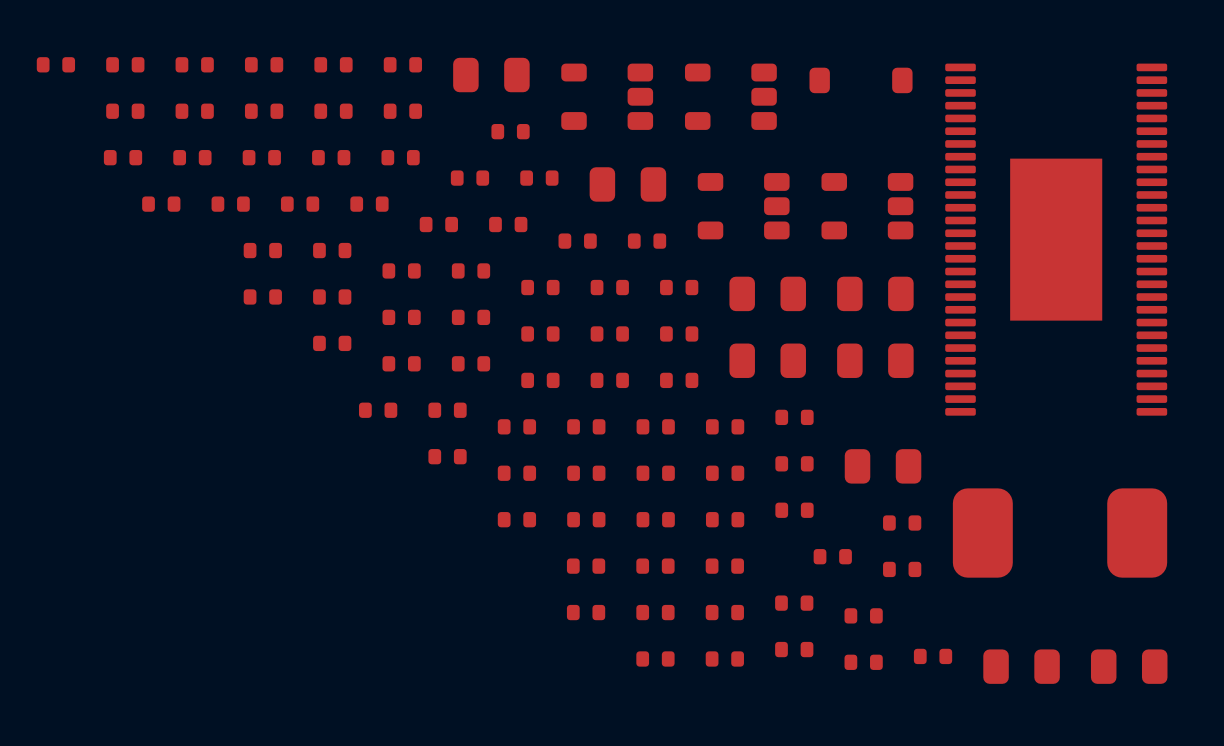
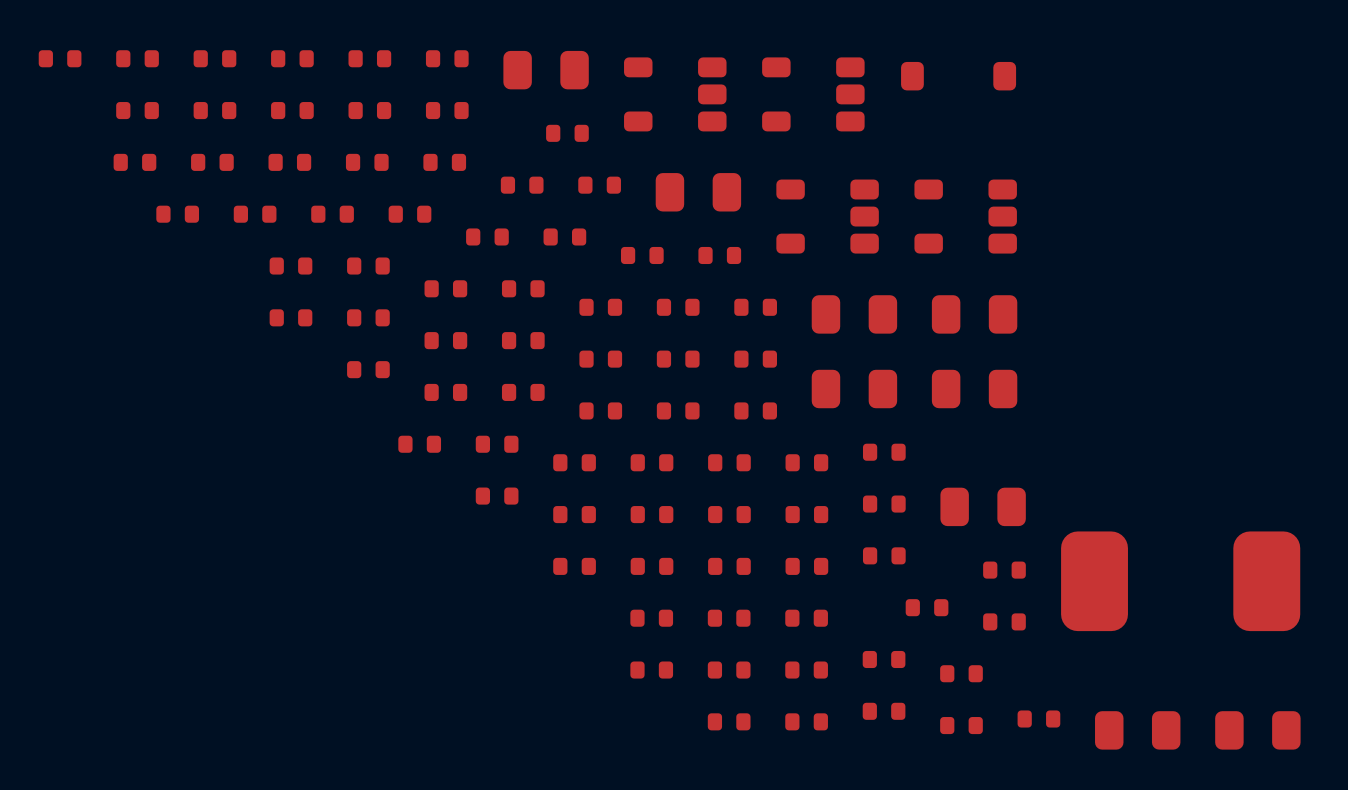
part: (1056, 239) -> none

